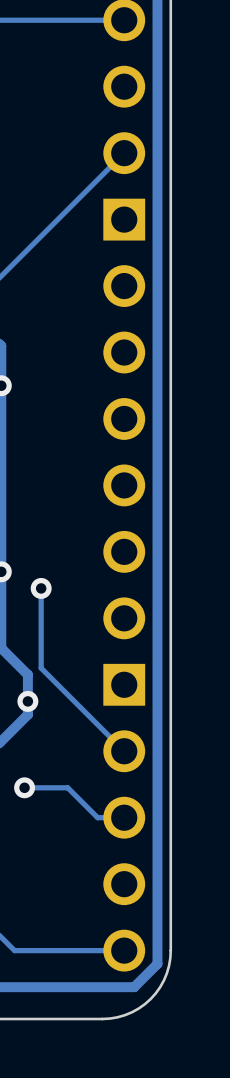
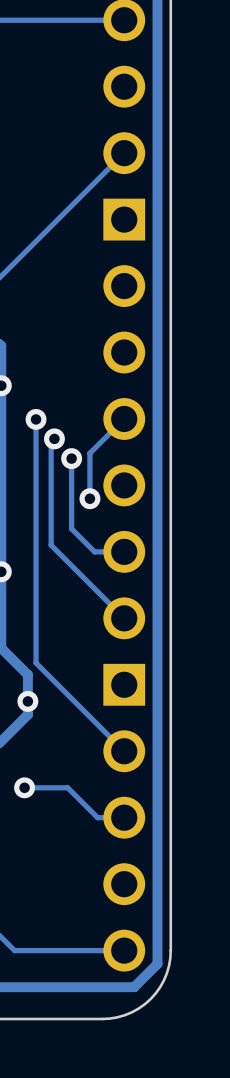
track: none -> (124, 418) (89, 453) (89, 498)
via: none -> (36, 419)
track: none -> (54, 438) (51, 442) (51, 545) (124, 618)
via: none -> (54, 438)
track: none -> (71, 458) (71, 528) (94, 551) (124, 551)
via: none -> (71, 458)
via: none -> (89, 498)
track: (41, 588) (41, 668) -> (36, 419) (36, 663) (41, 668)
via: (41, 588) -> none

